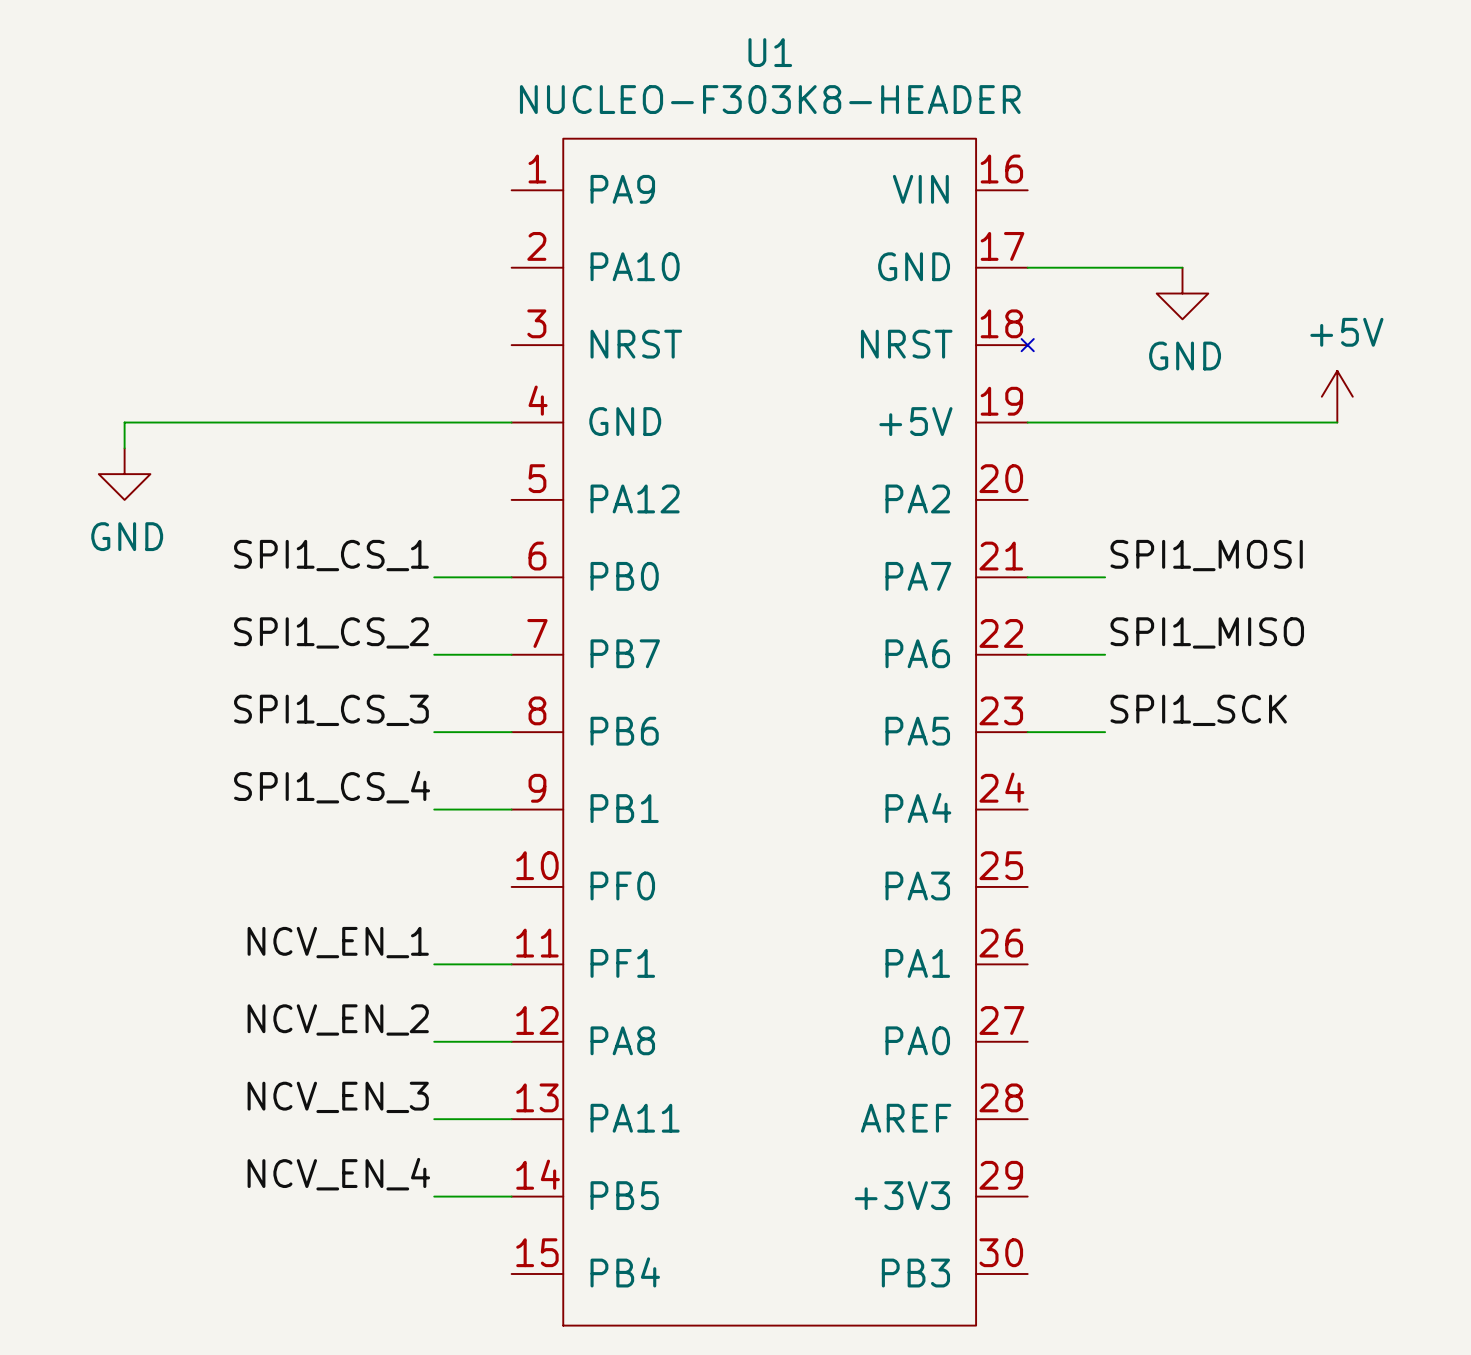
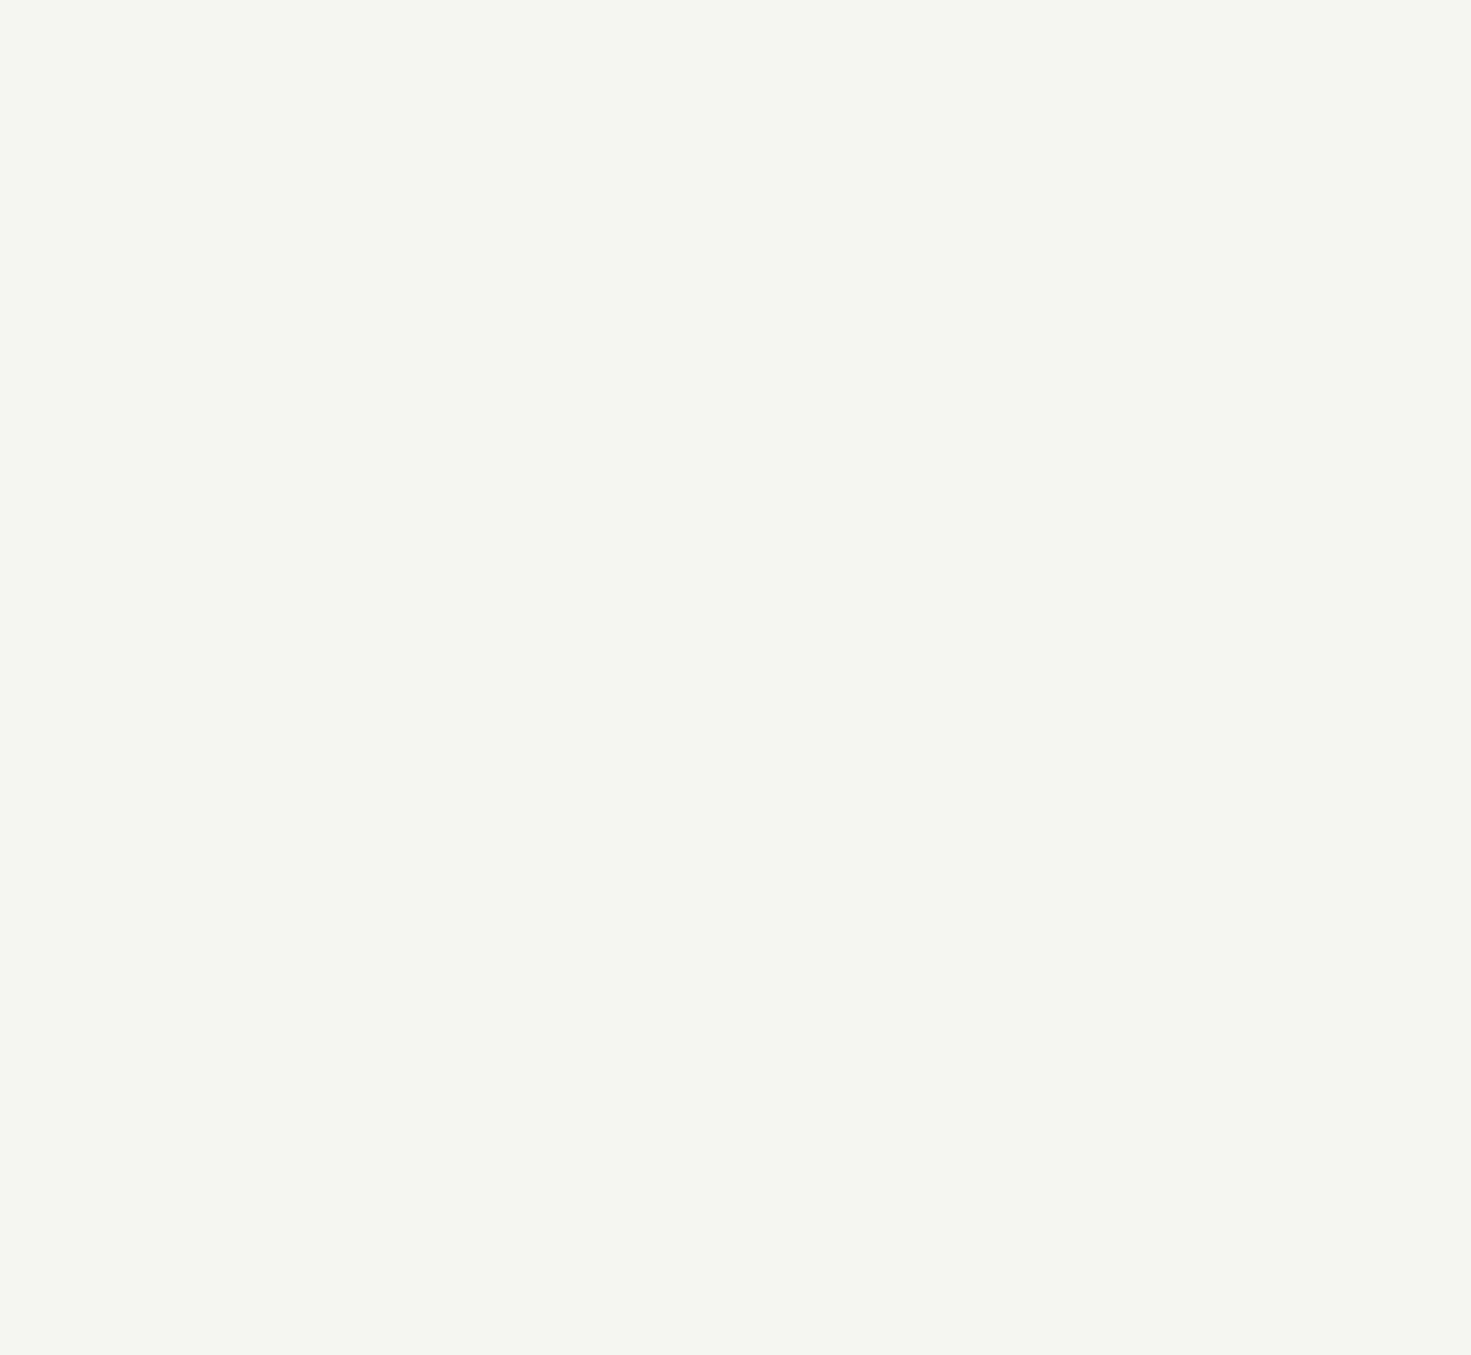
wire: (1027, 267) (1182, 267) -> none
power symbol: GND (1182, 293) -> none
power symbol: +5V (1337, 396) -> none
wire: (511, 422) (124, 422) (124, 448) -> none
wire: (1027, 422) (1337, 422) -> none
power symbol: GND (124, 474) -> none
label: SPI1_CS_1 (331, 555) -> none
label: SPI1_MOSI (1206, 555) -> none
wire: (434, 577) (511, 577) -> none
wire: (1027, 577) (1105, 577) -> none
label: SPI1_CS_2 (331, 632) -> none
label: SPI1_MISO (1207, 632) -> none
wire: (434, 654) (511, 654) -> none
wire: (1027, 654) (1105, 654) -> none
label: SPI1_CS_3 (331, 710) -> none
label: SPI1_SCK (1198, 710) -> none
wire: (434, 732) (511, 732) -> none
U1: NUCLEO-F303K8-HEADER (772, 732) -> none
wire: (1027, 732) (1105, 732) -> none
label: SPI1_CS_4 (332, 787) -> none
wire: (434, 809) (511, 809) -> none
label: NCV_EN_1 (338, 942) -> none
wire: (434, 964) (511, 964) -> none
label: NCV_EN_2 (338, 1019) -> none
wire: (434, 1041) (511, 1041) -> none
label: NCV_EN_3 (338, 1097) -> none
wire: (434, 1119) (511, 1119) -> none
label: NCV_EN_4 (338, 1174) -> none
wire: (434, 1196) (511, 1196) -> none

